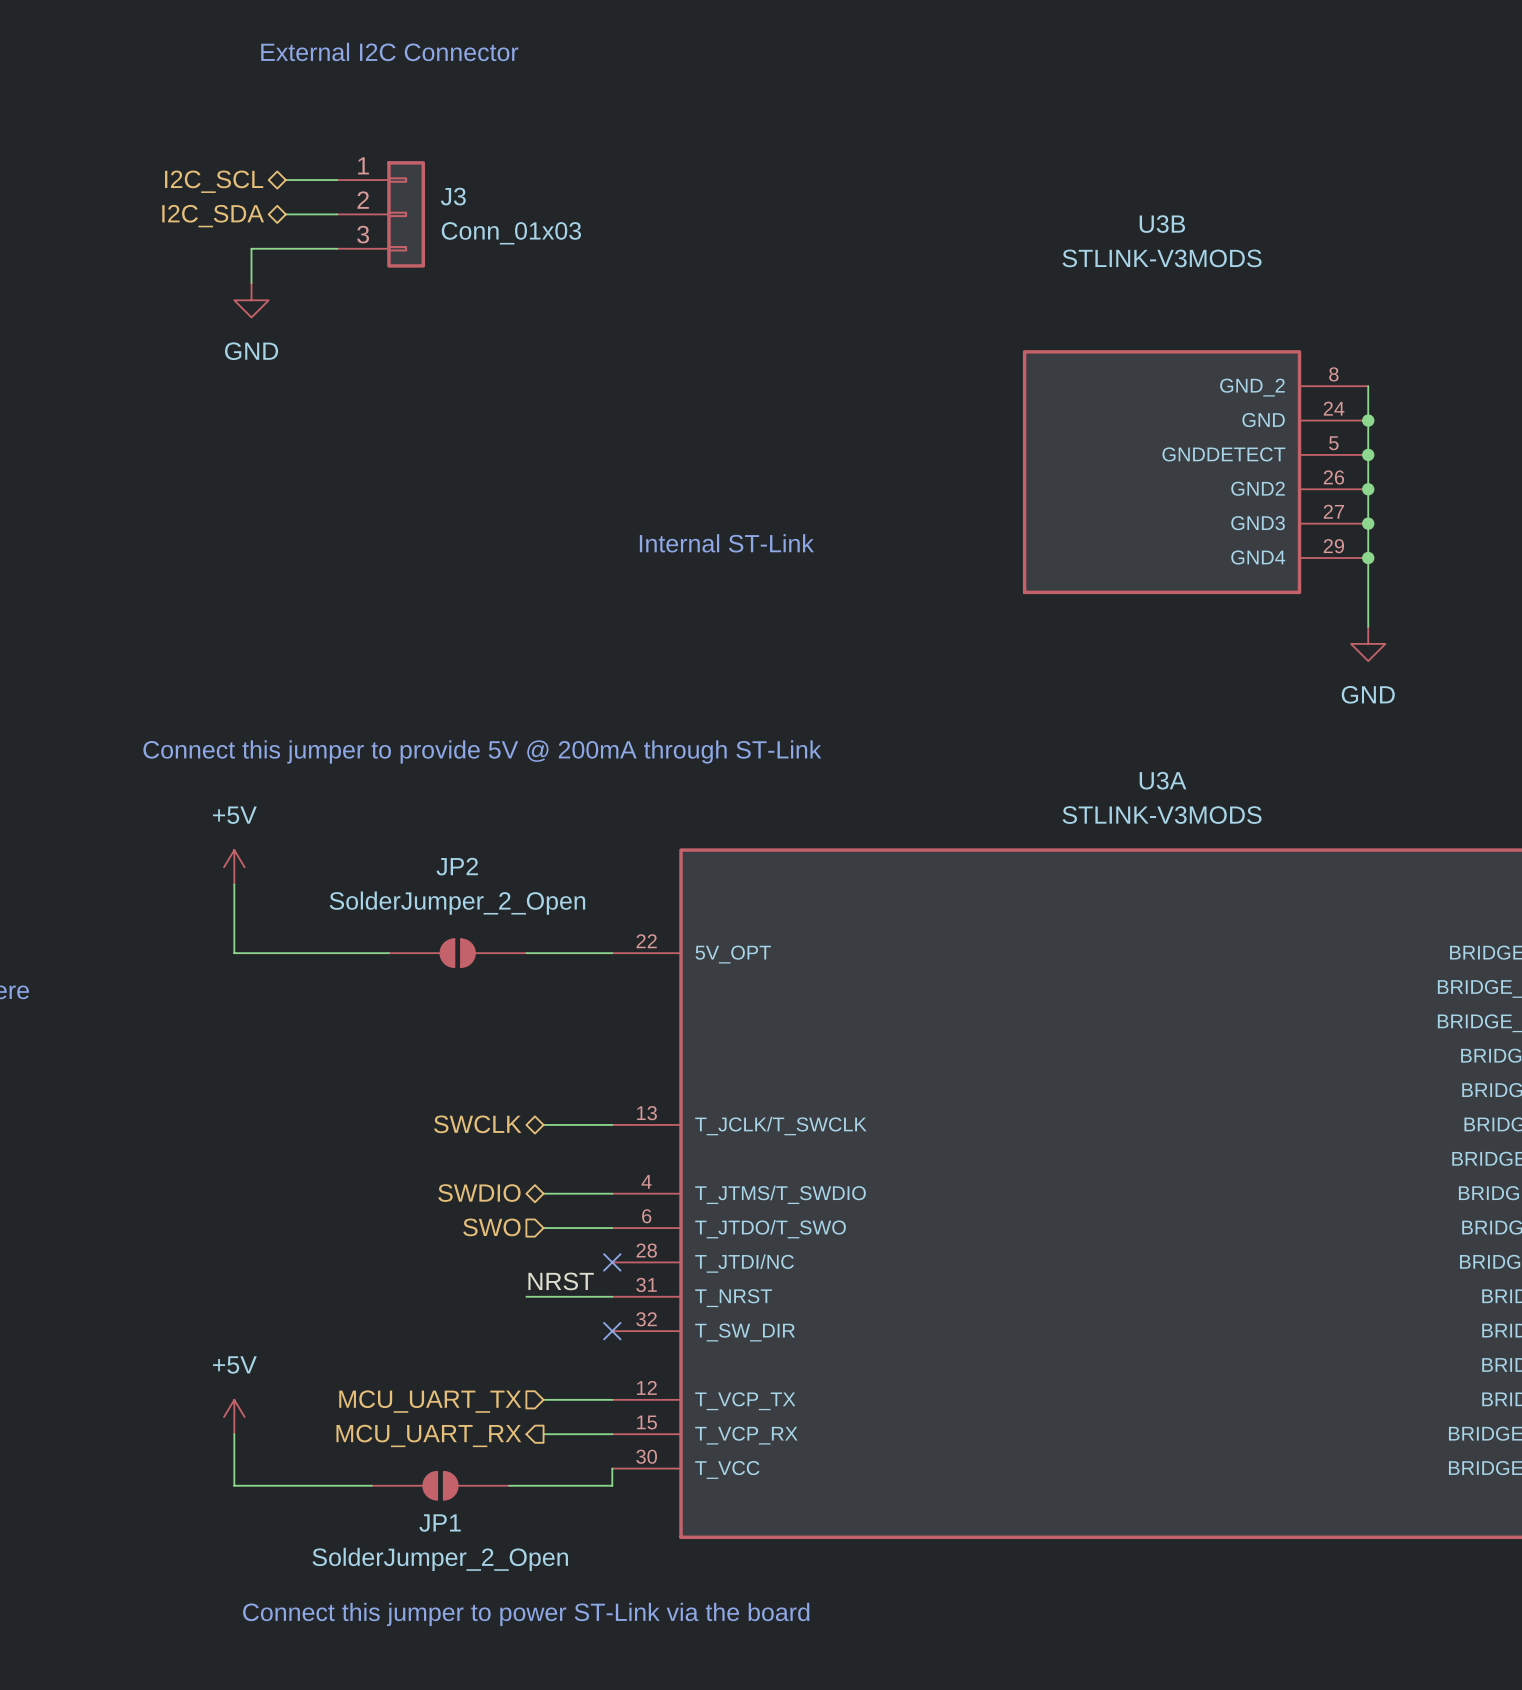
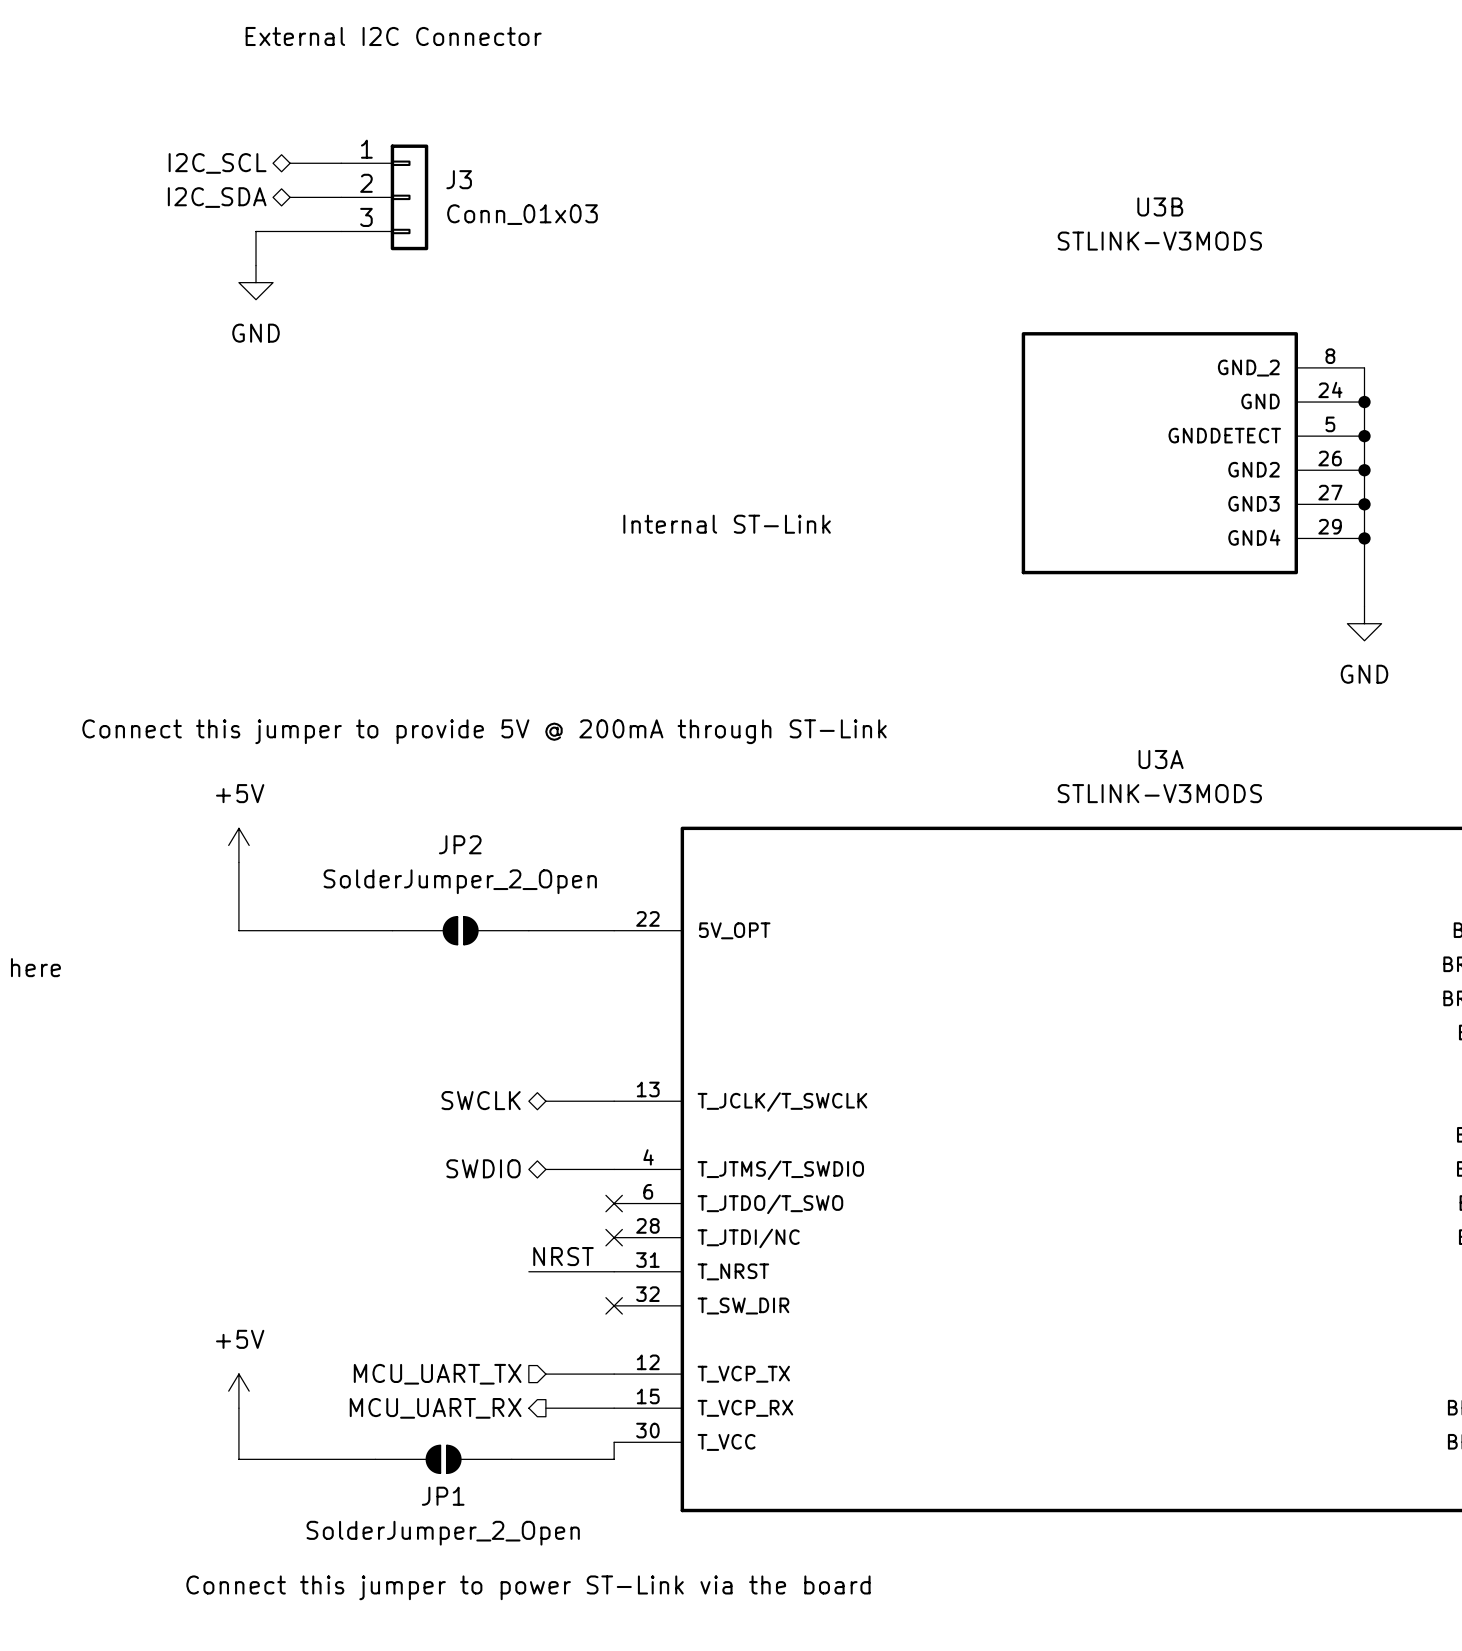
hierarchical label: SWO (491, 1227) -> none
wire: (543, 1228) (612, 1228) -> none
no-connect mark: none -> (614, 1203)

